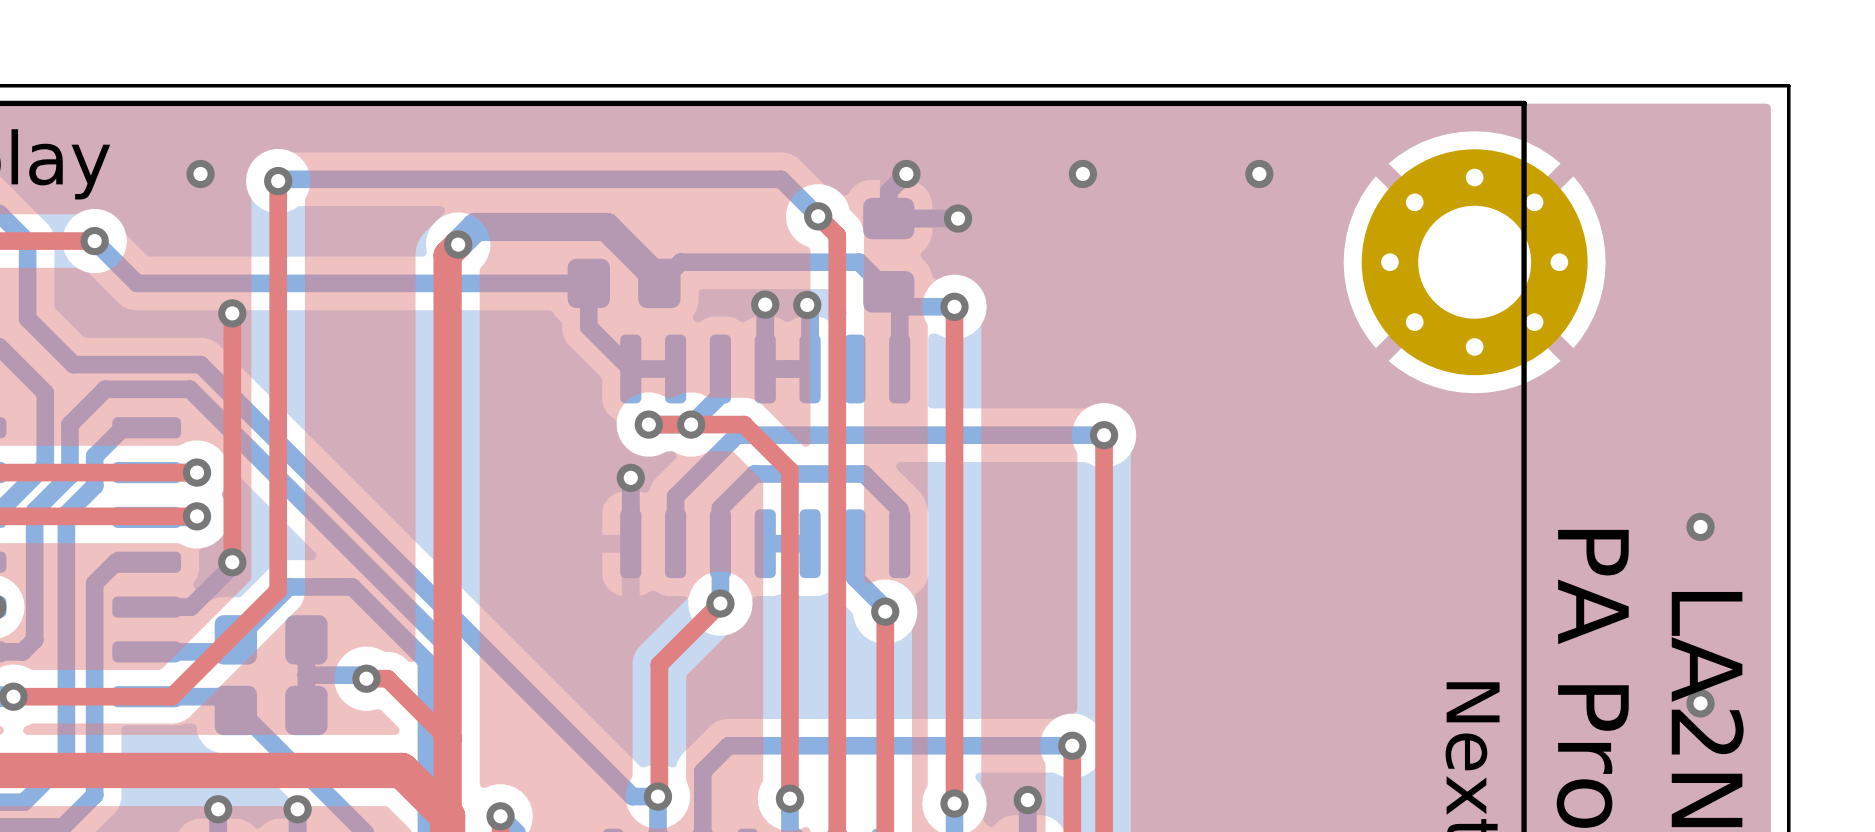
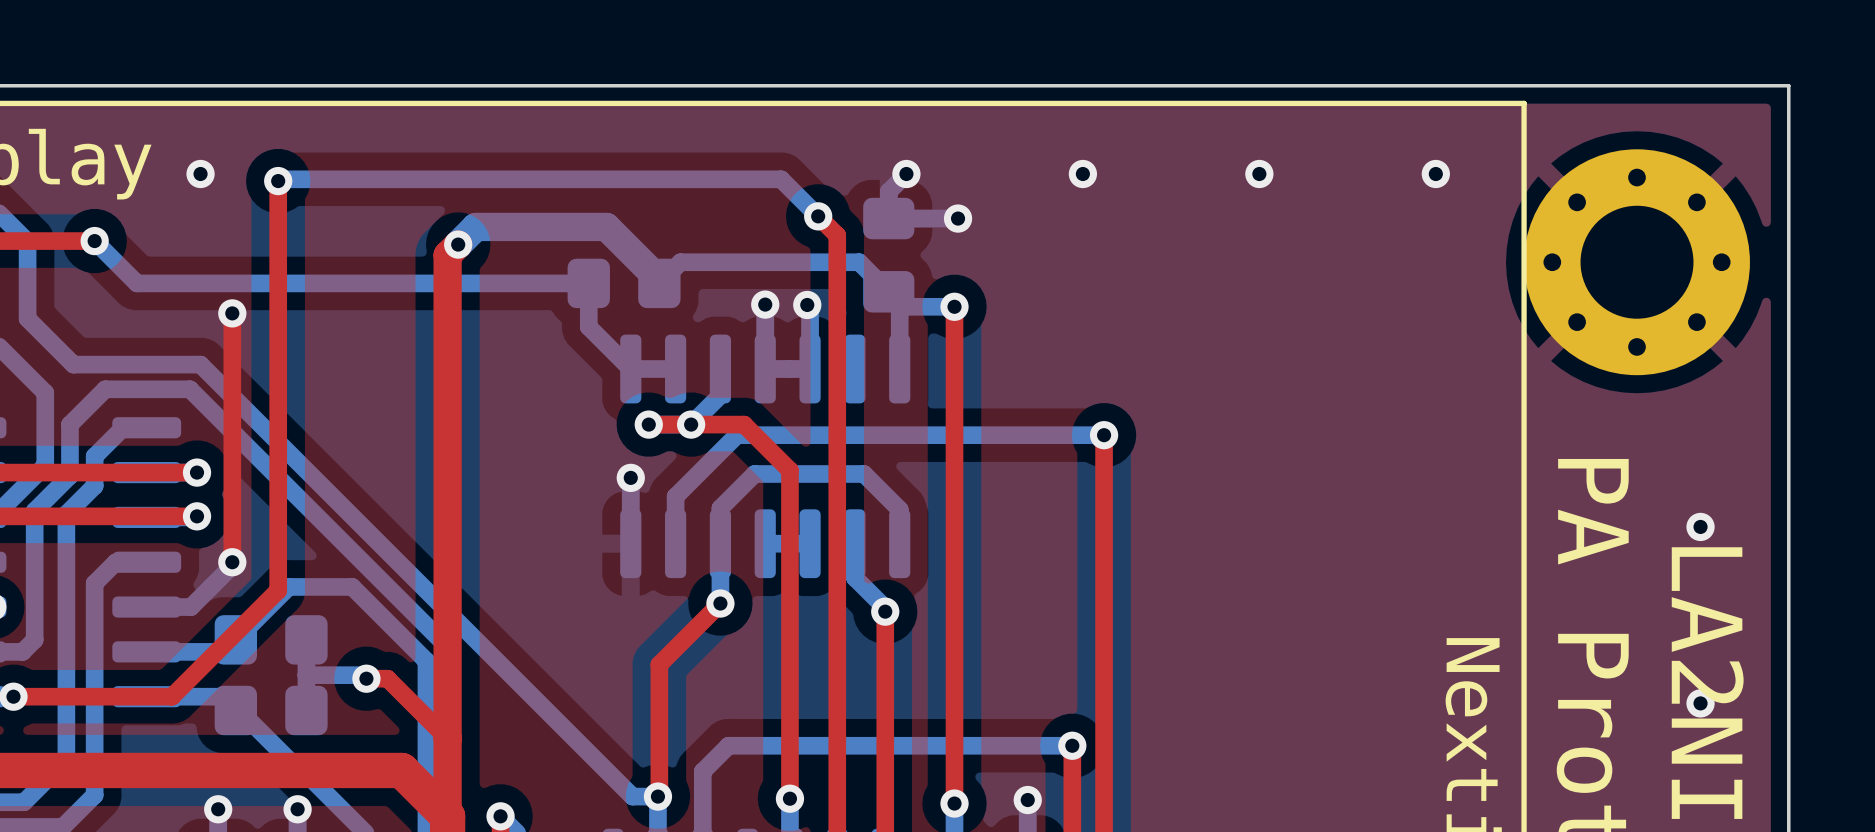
via: none -> (1435, 174)
part position: (1474, 262) -> (1637, 262)

